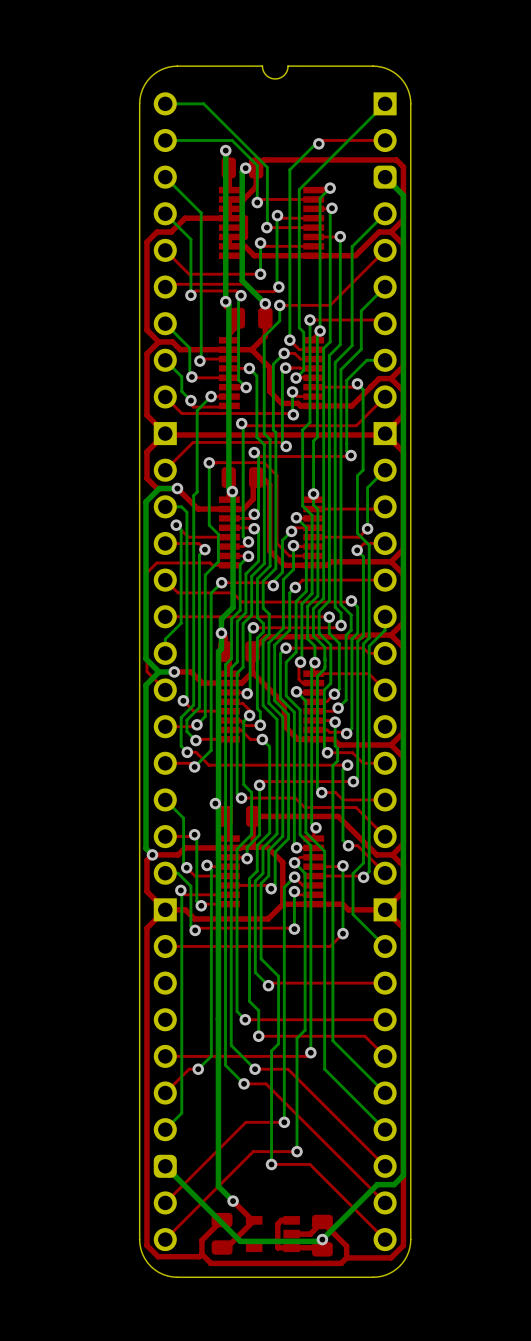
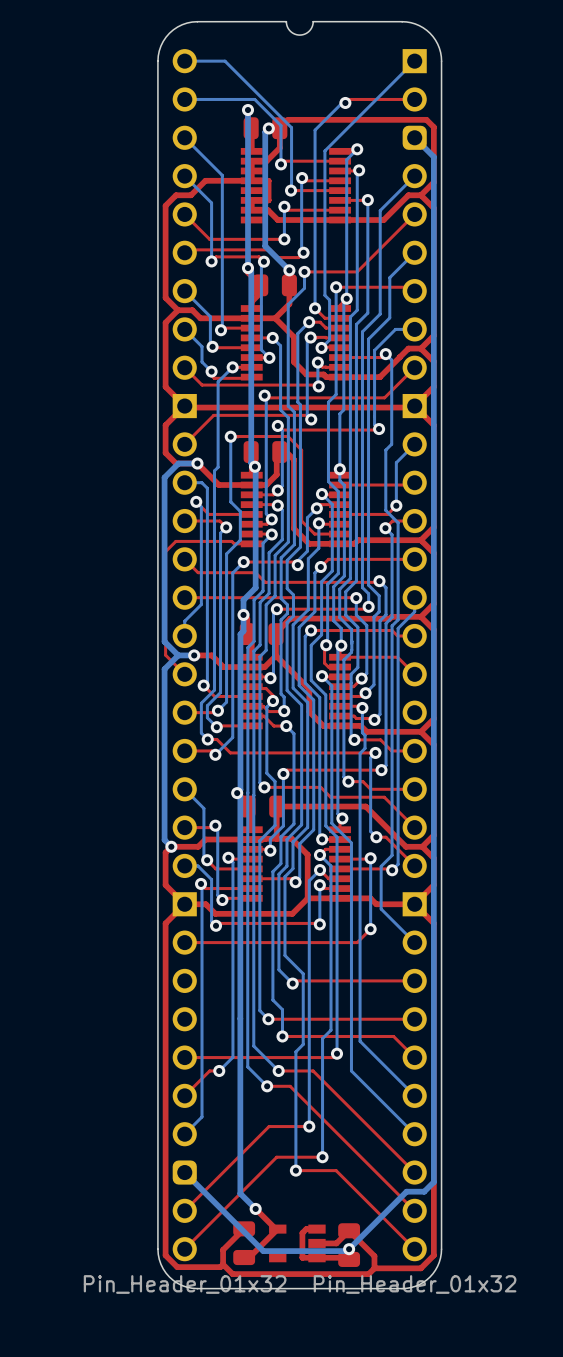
drawing: none -> [83, 1275, 517, 1294]

